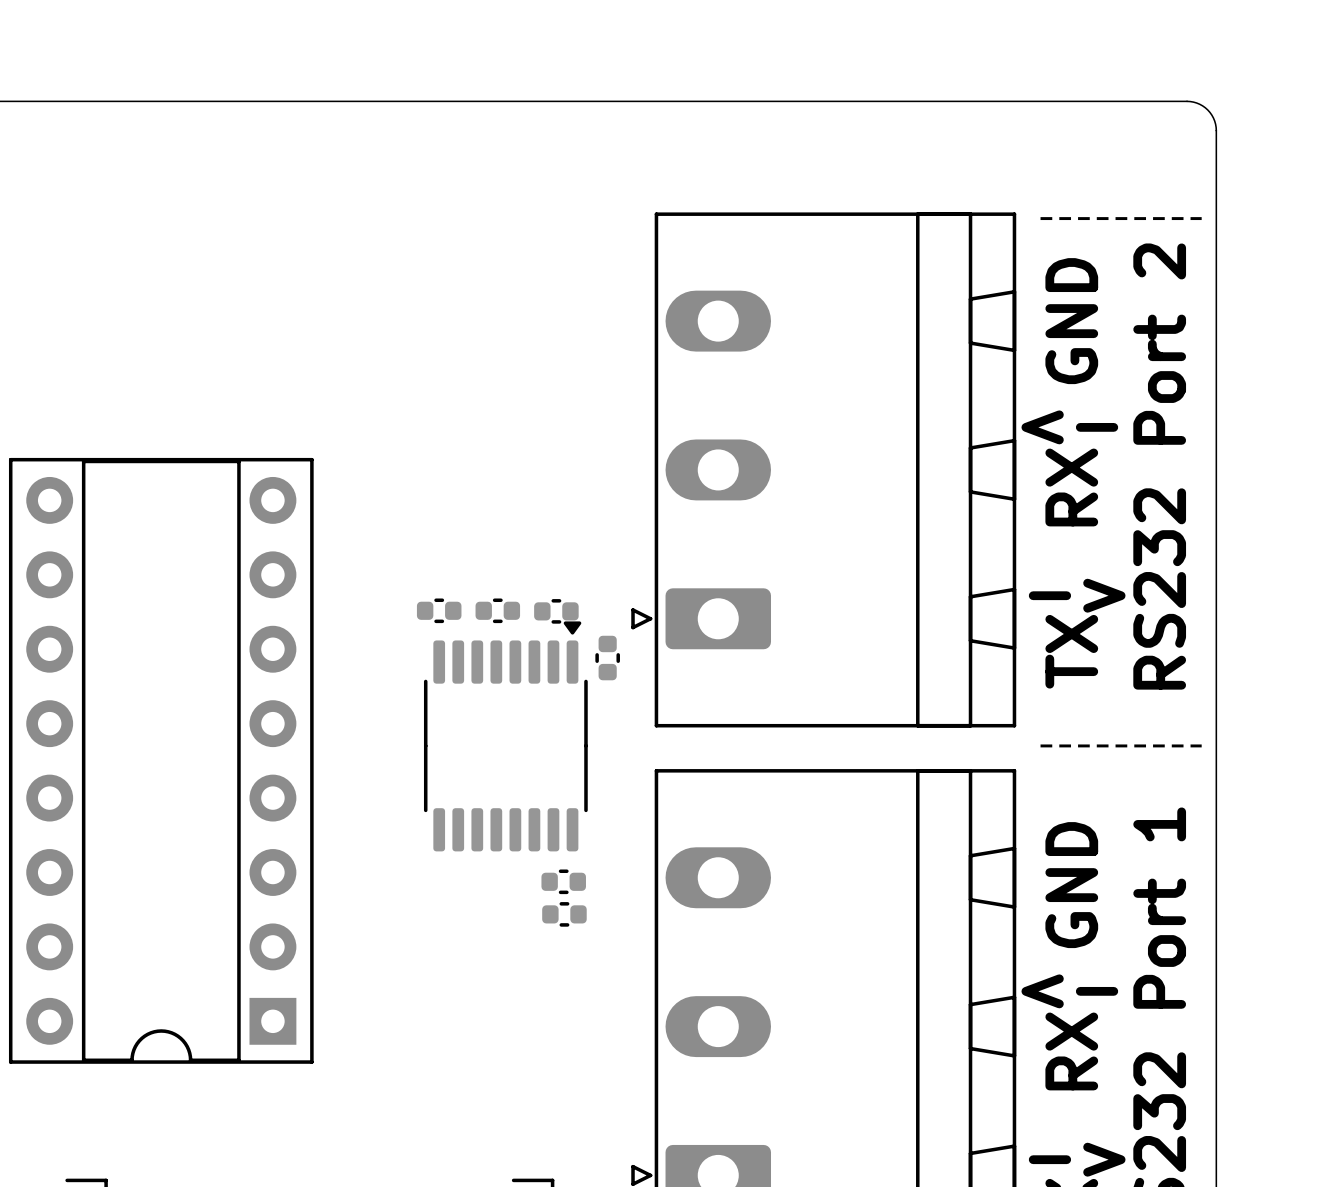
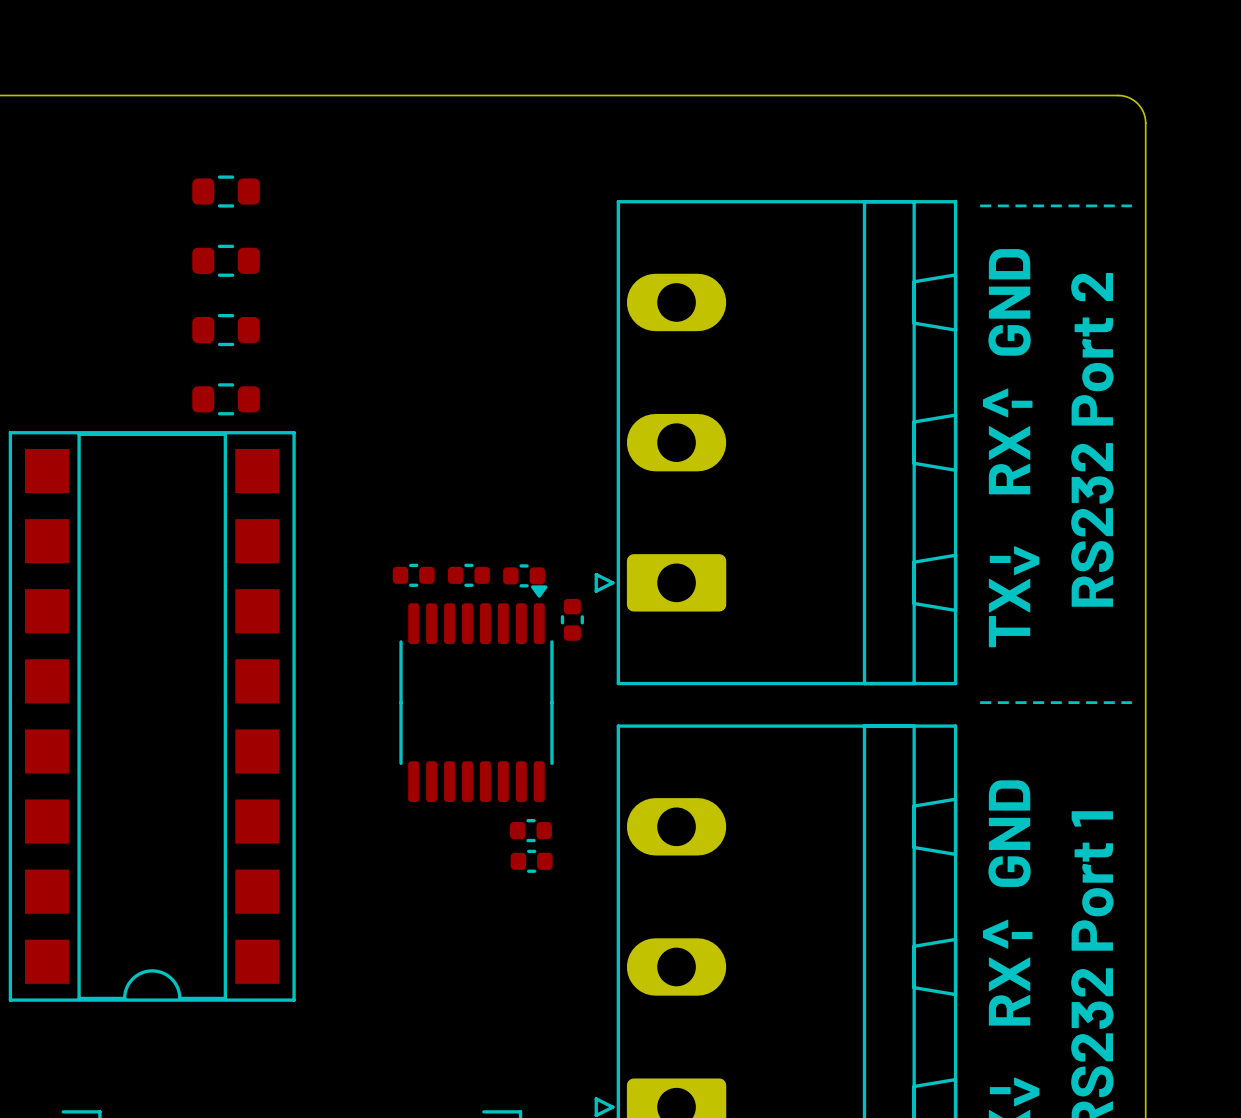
part: none -> (226, 191)
part: none -> (226, 260)
part: none -> (226, 330)
part: none -> (226, 399)
part footprint: [8, 457, 314, 1064] -> [8, 431, 296, 1002]

